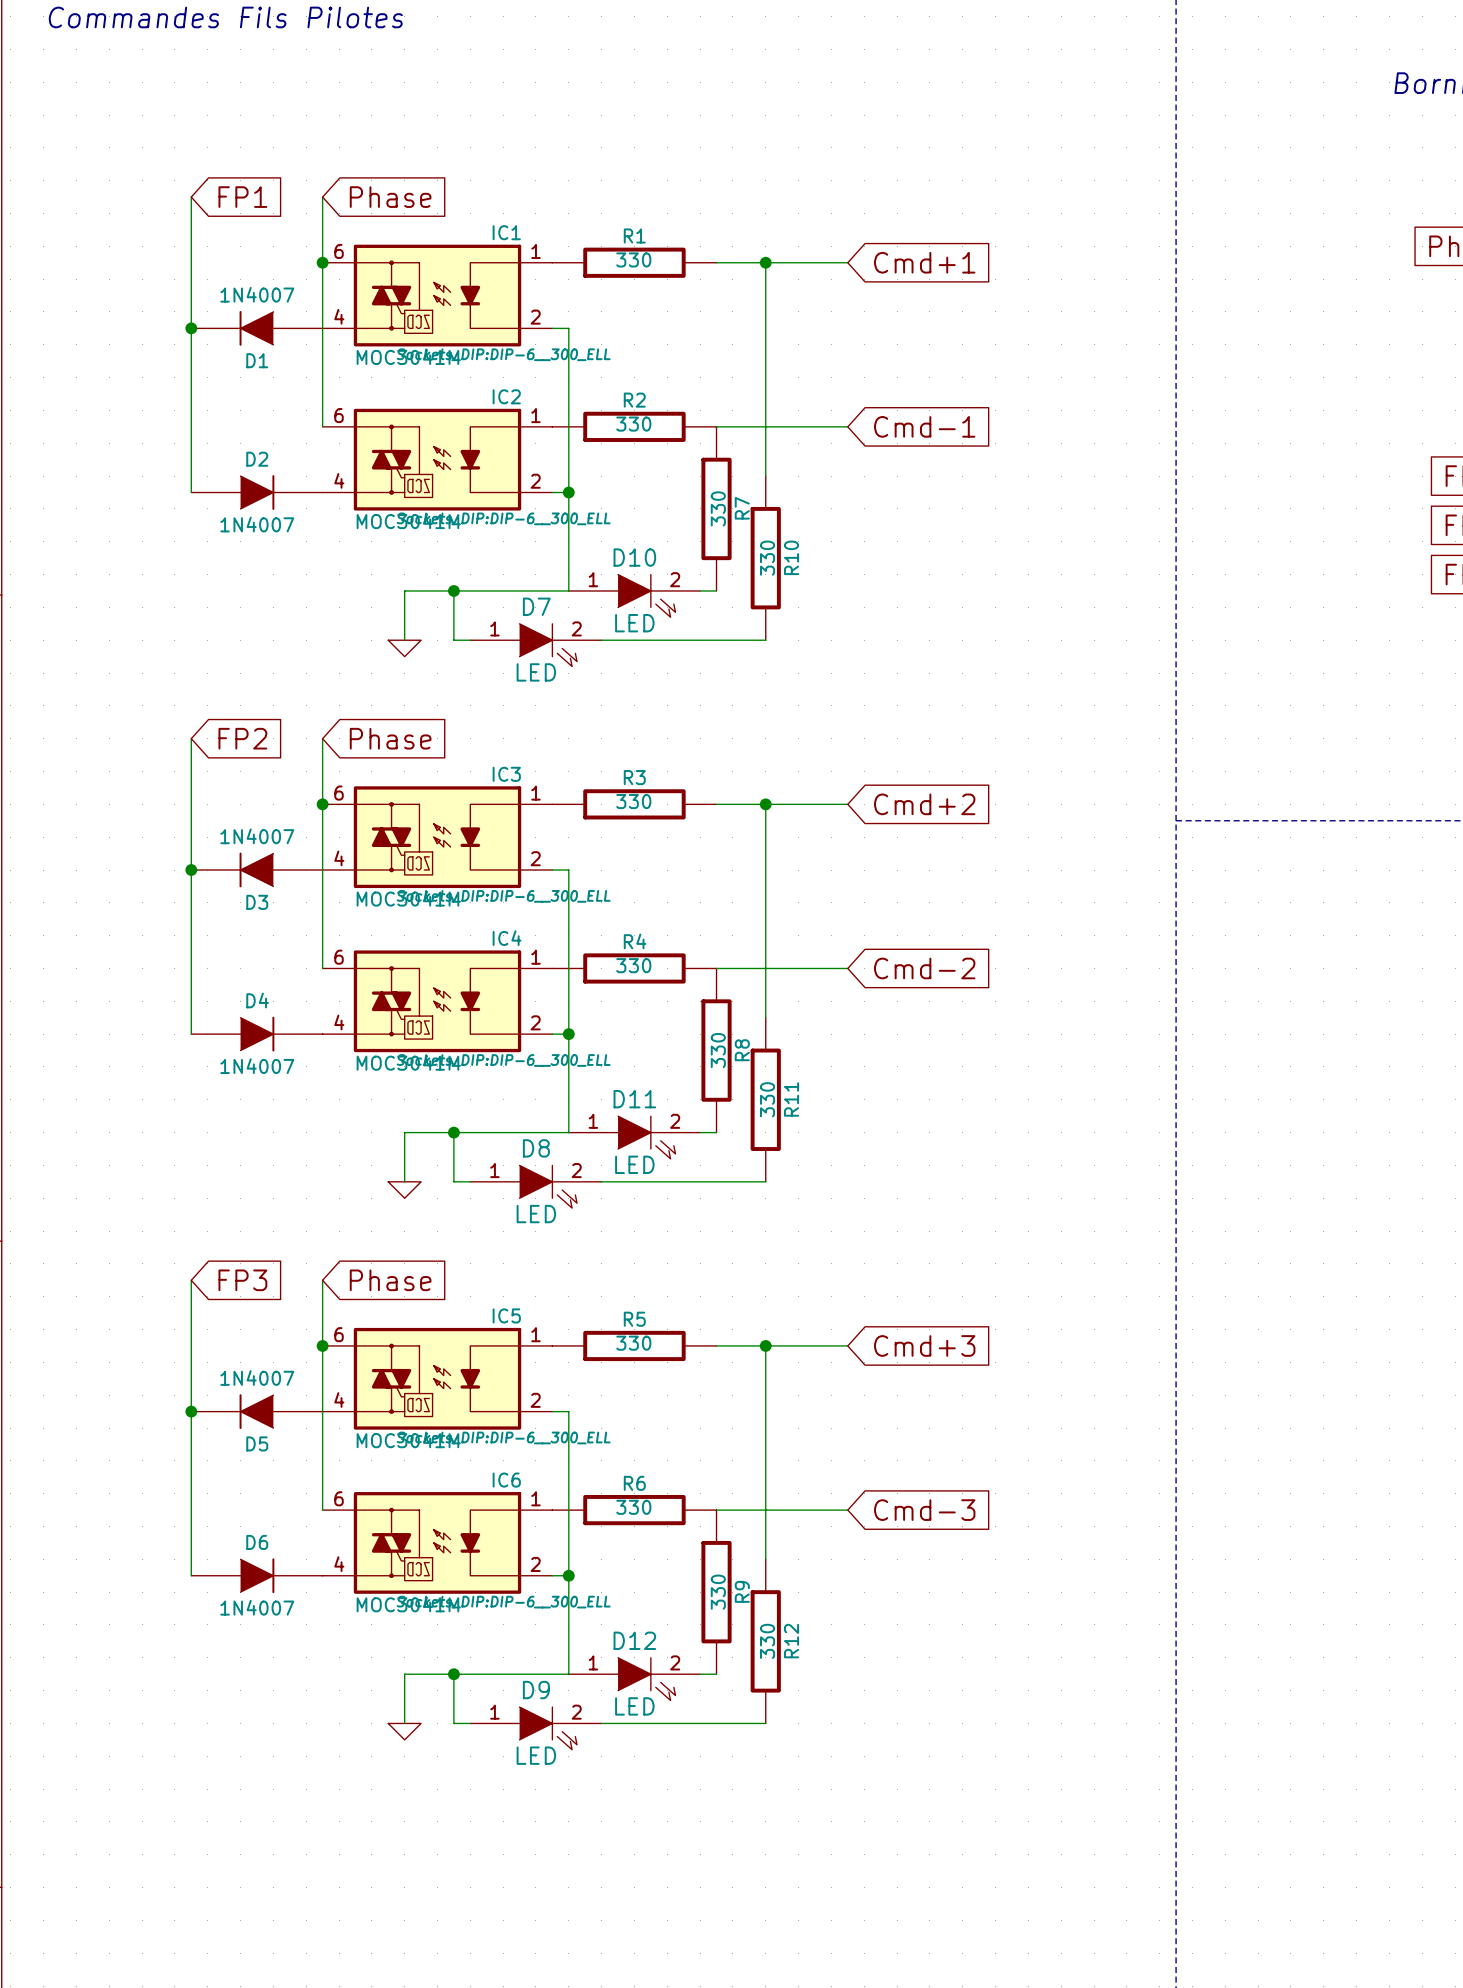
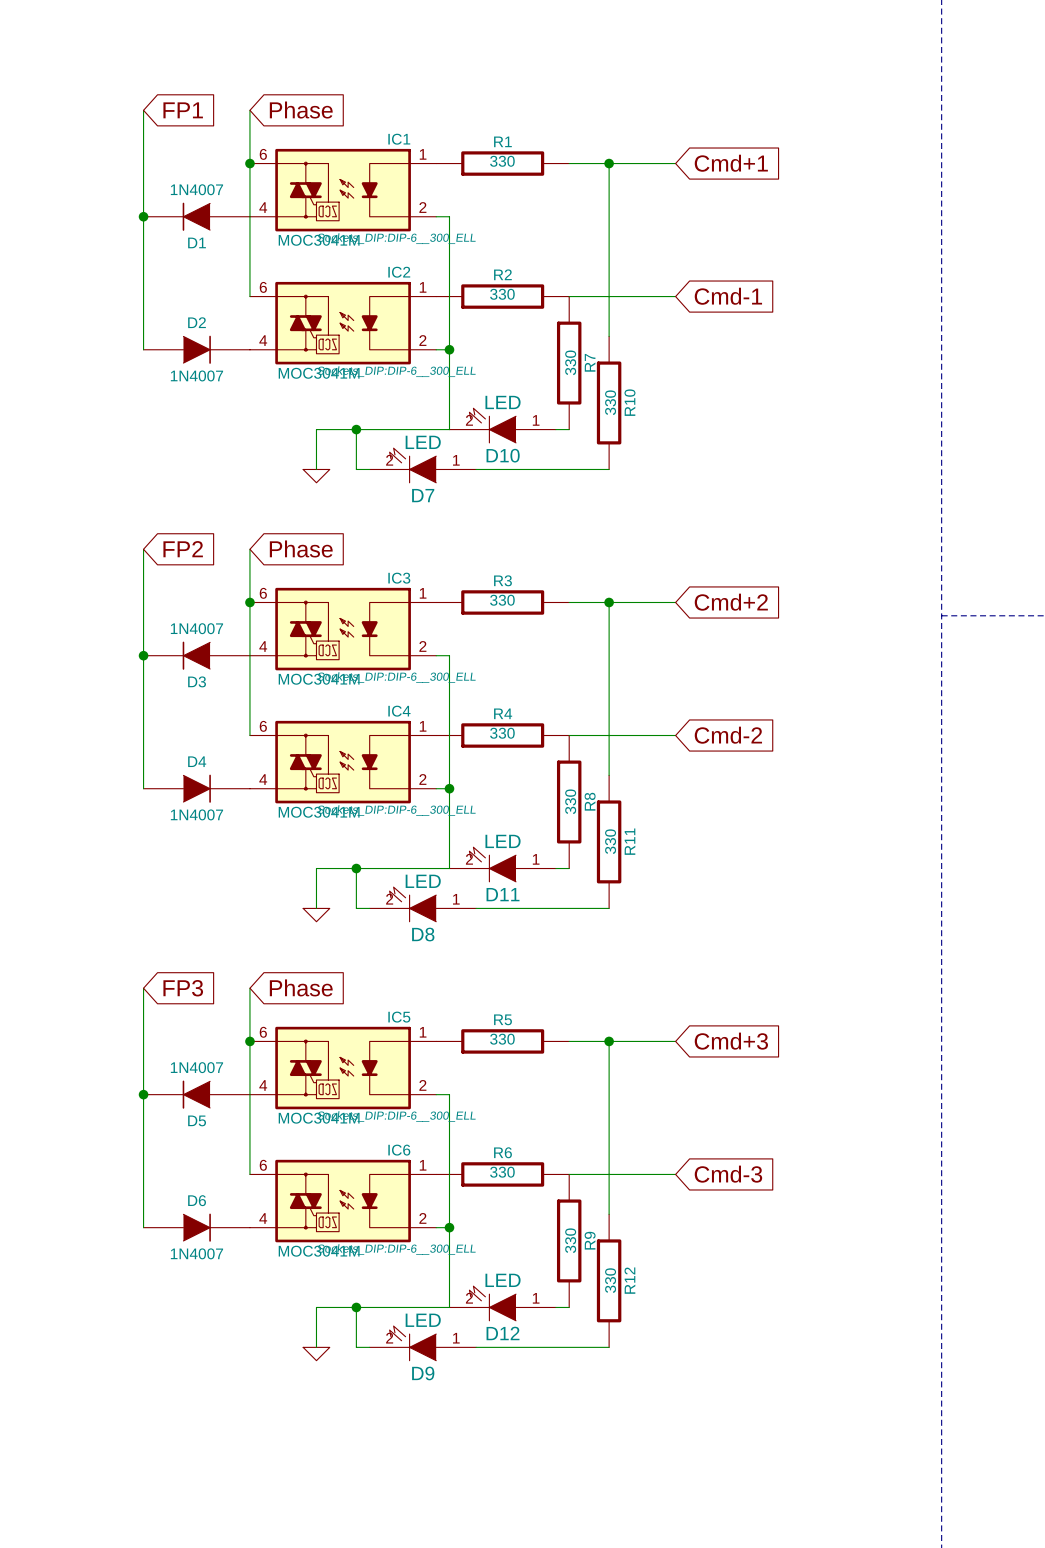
D10 rotation: 0° (646, 595) -> 180° (492, 425)
D7 rotation: 0° (548, 645) -> 180° (412, 465)
D11 rotation: 0° (646, 1137) -> 180° (492, 864)
D8 rotation: 0° (548, 1186) -> 180° (412, 904)
D12 rotation: 0° (646, 1679) -> 180° (492, 1303)
D9 rotation: 0° (548, 1728) -> 180° (412, 1343)

